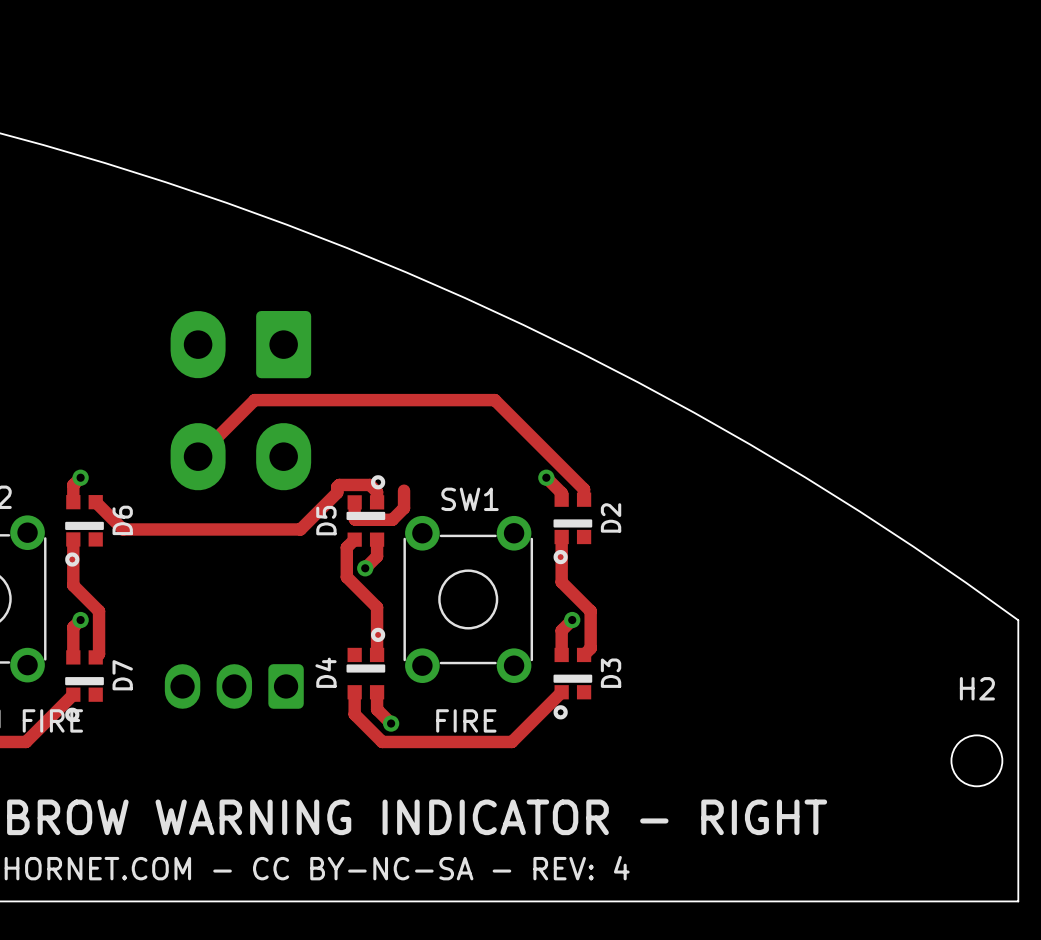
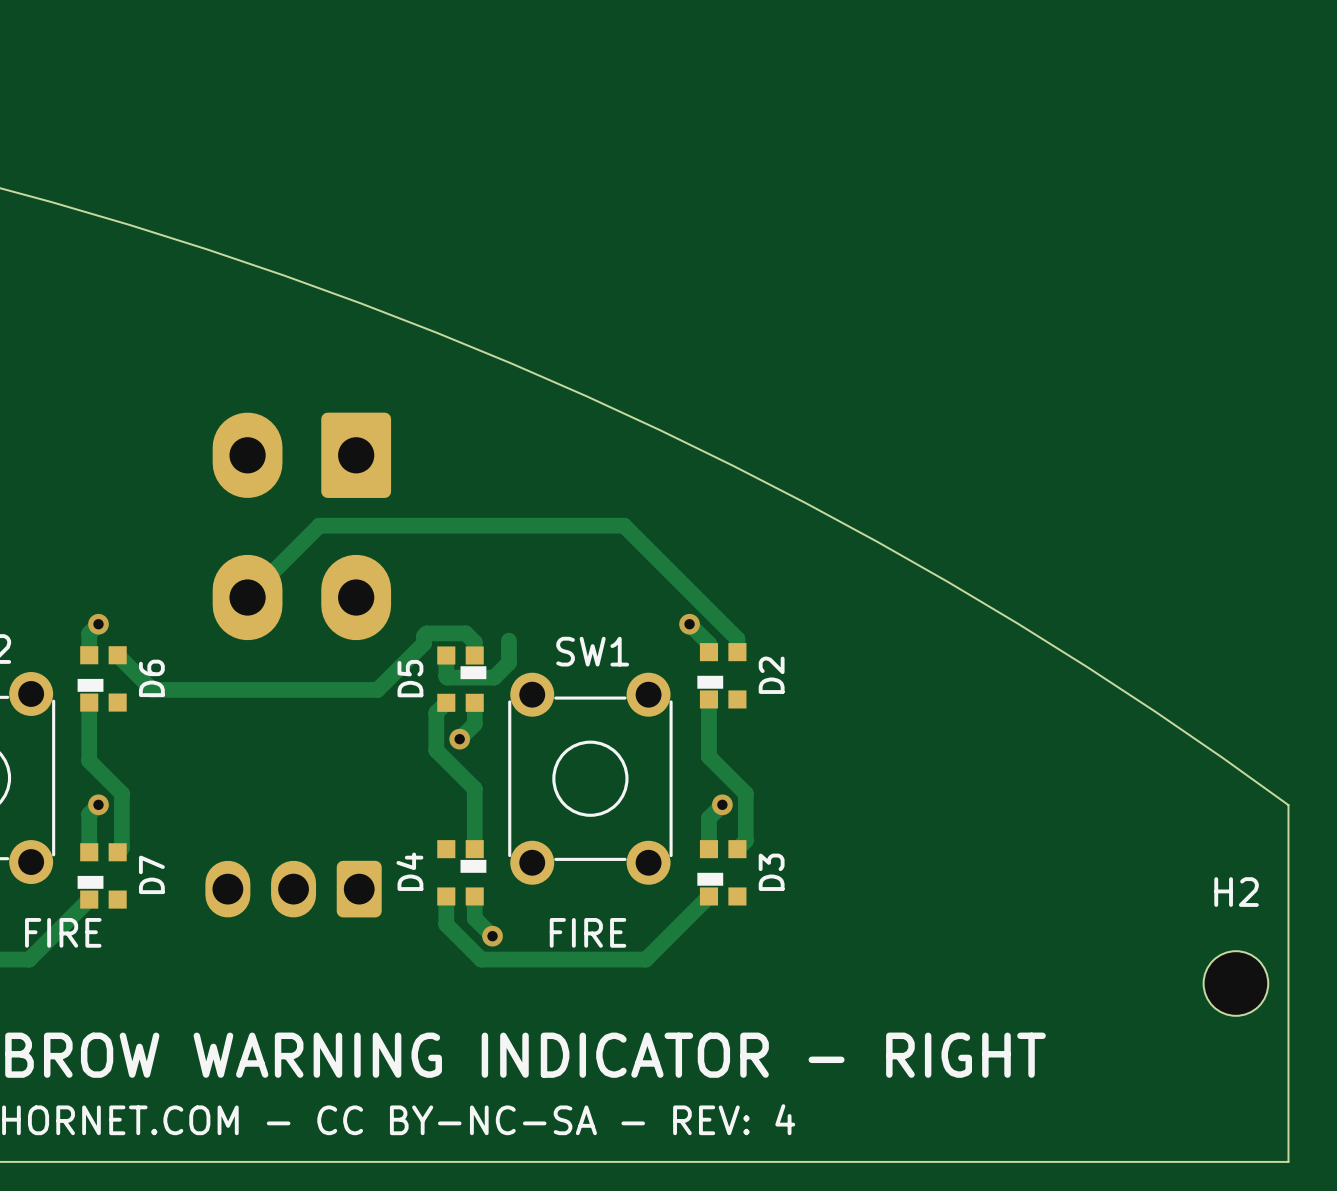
D5 footprint: [346, 475, 386, 547] -> [437, 646, 487, 712]
D2 footprint: [553, 492, 593, 565] -> [697, 643, 747, 709]
D6 footprint: [65, 495, 104, 567] -> [77, 646, 127, 712]
D4 footprint: [346, 627, 386, 700] -> [437, 840, 487, 906]
D3 footprint: [553, 647, 593, 720] -> [697, 840, 747, 906]
D7 footprint: [65, 650, 104, 722] -> [77, 843, 127, 909]

